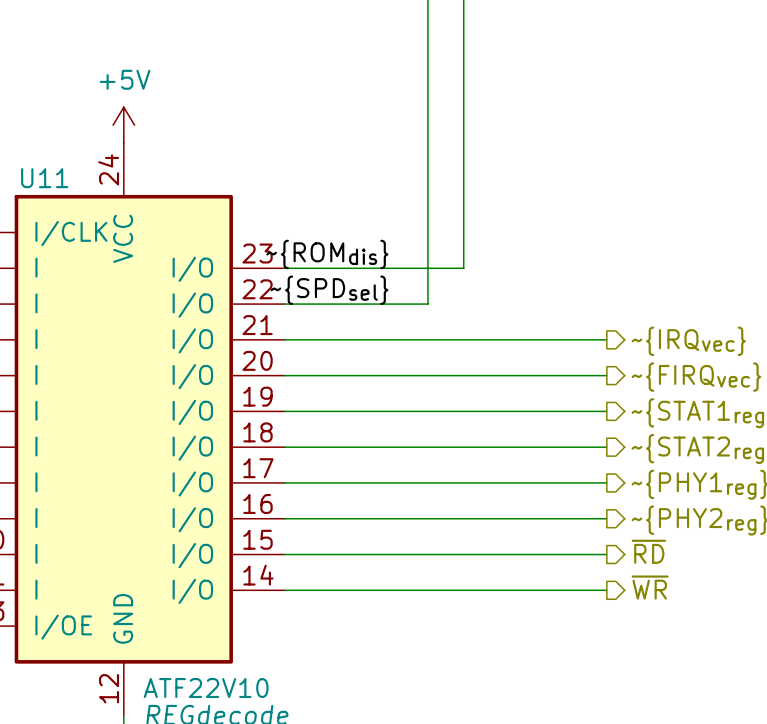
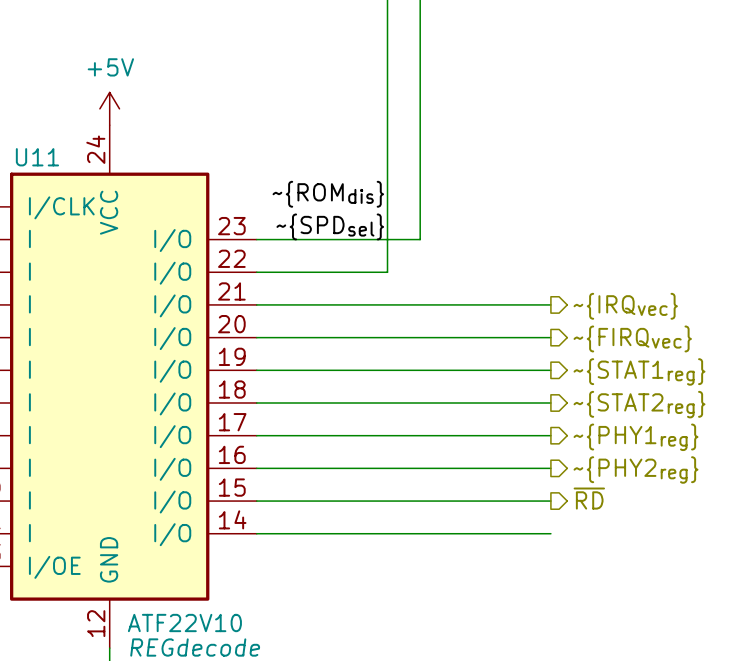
label position: ~{ROMdis} (327, 254) -> ~{ROMdis} (328, 194)
label position: ~{SPDsel} (329, 290) -> ~{SPDsel} (330, 226)
hierarchical label: ~{WR} (650, 587) -> none

